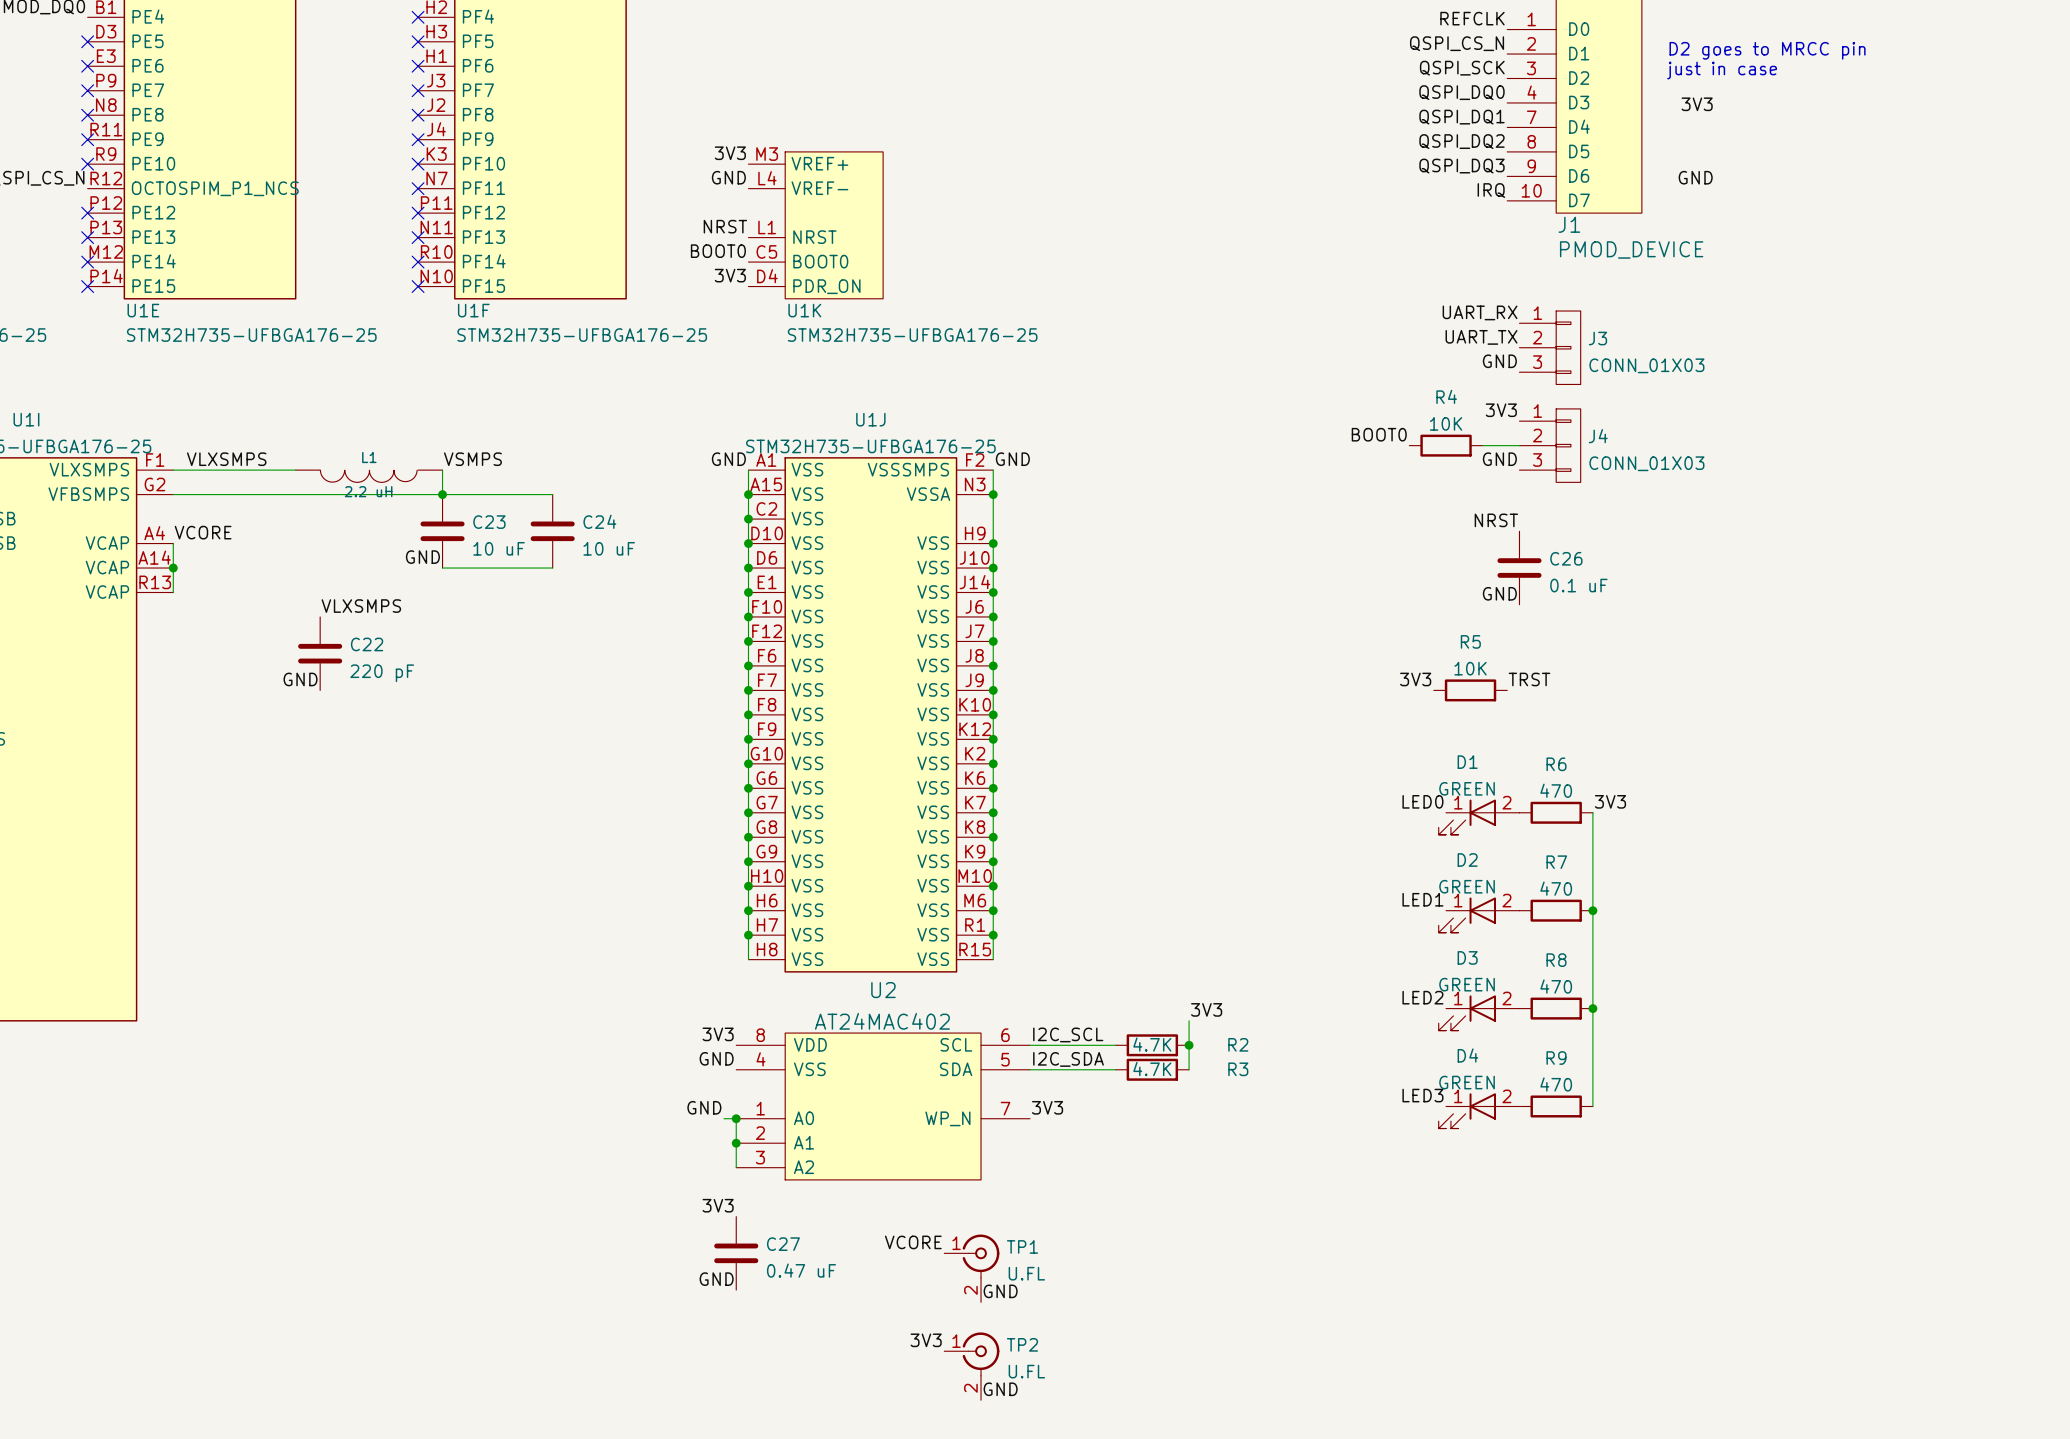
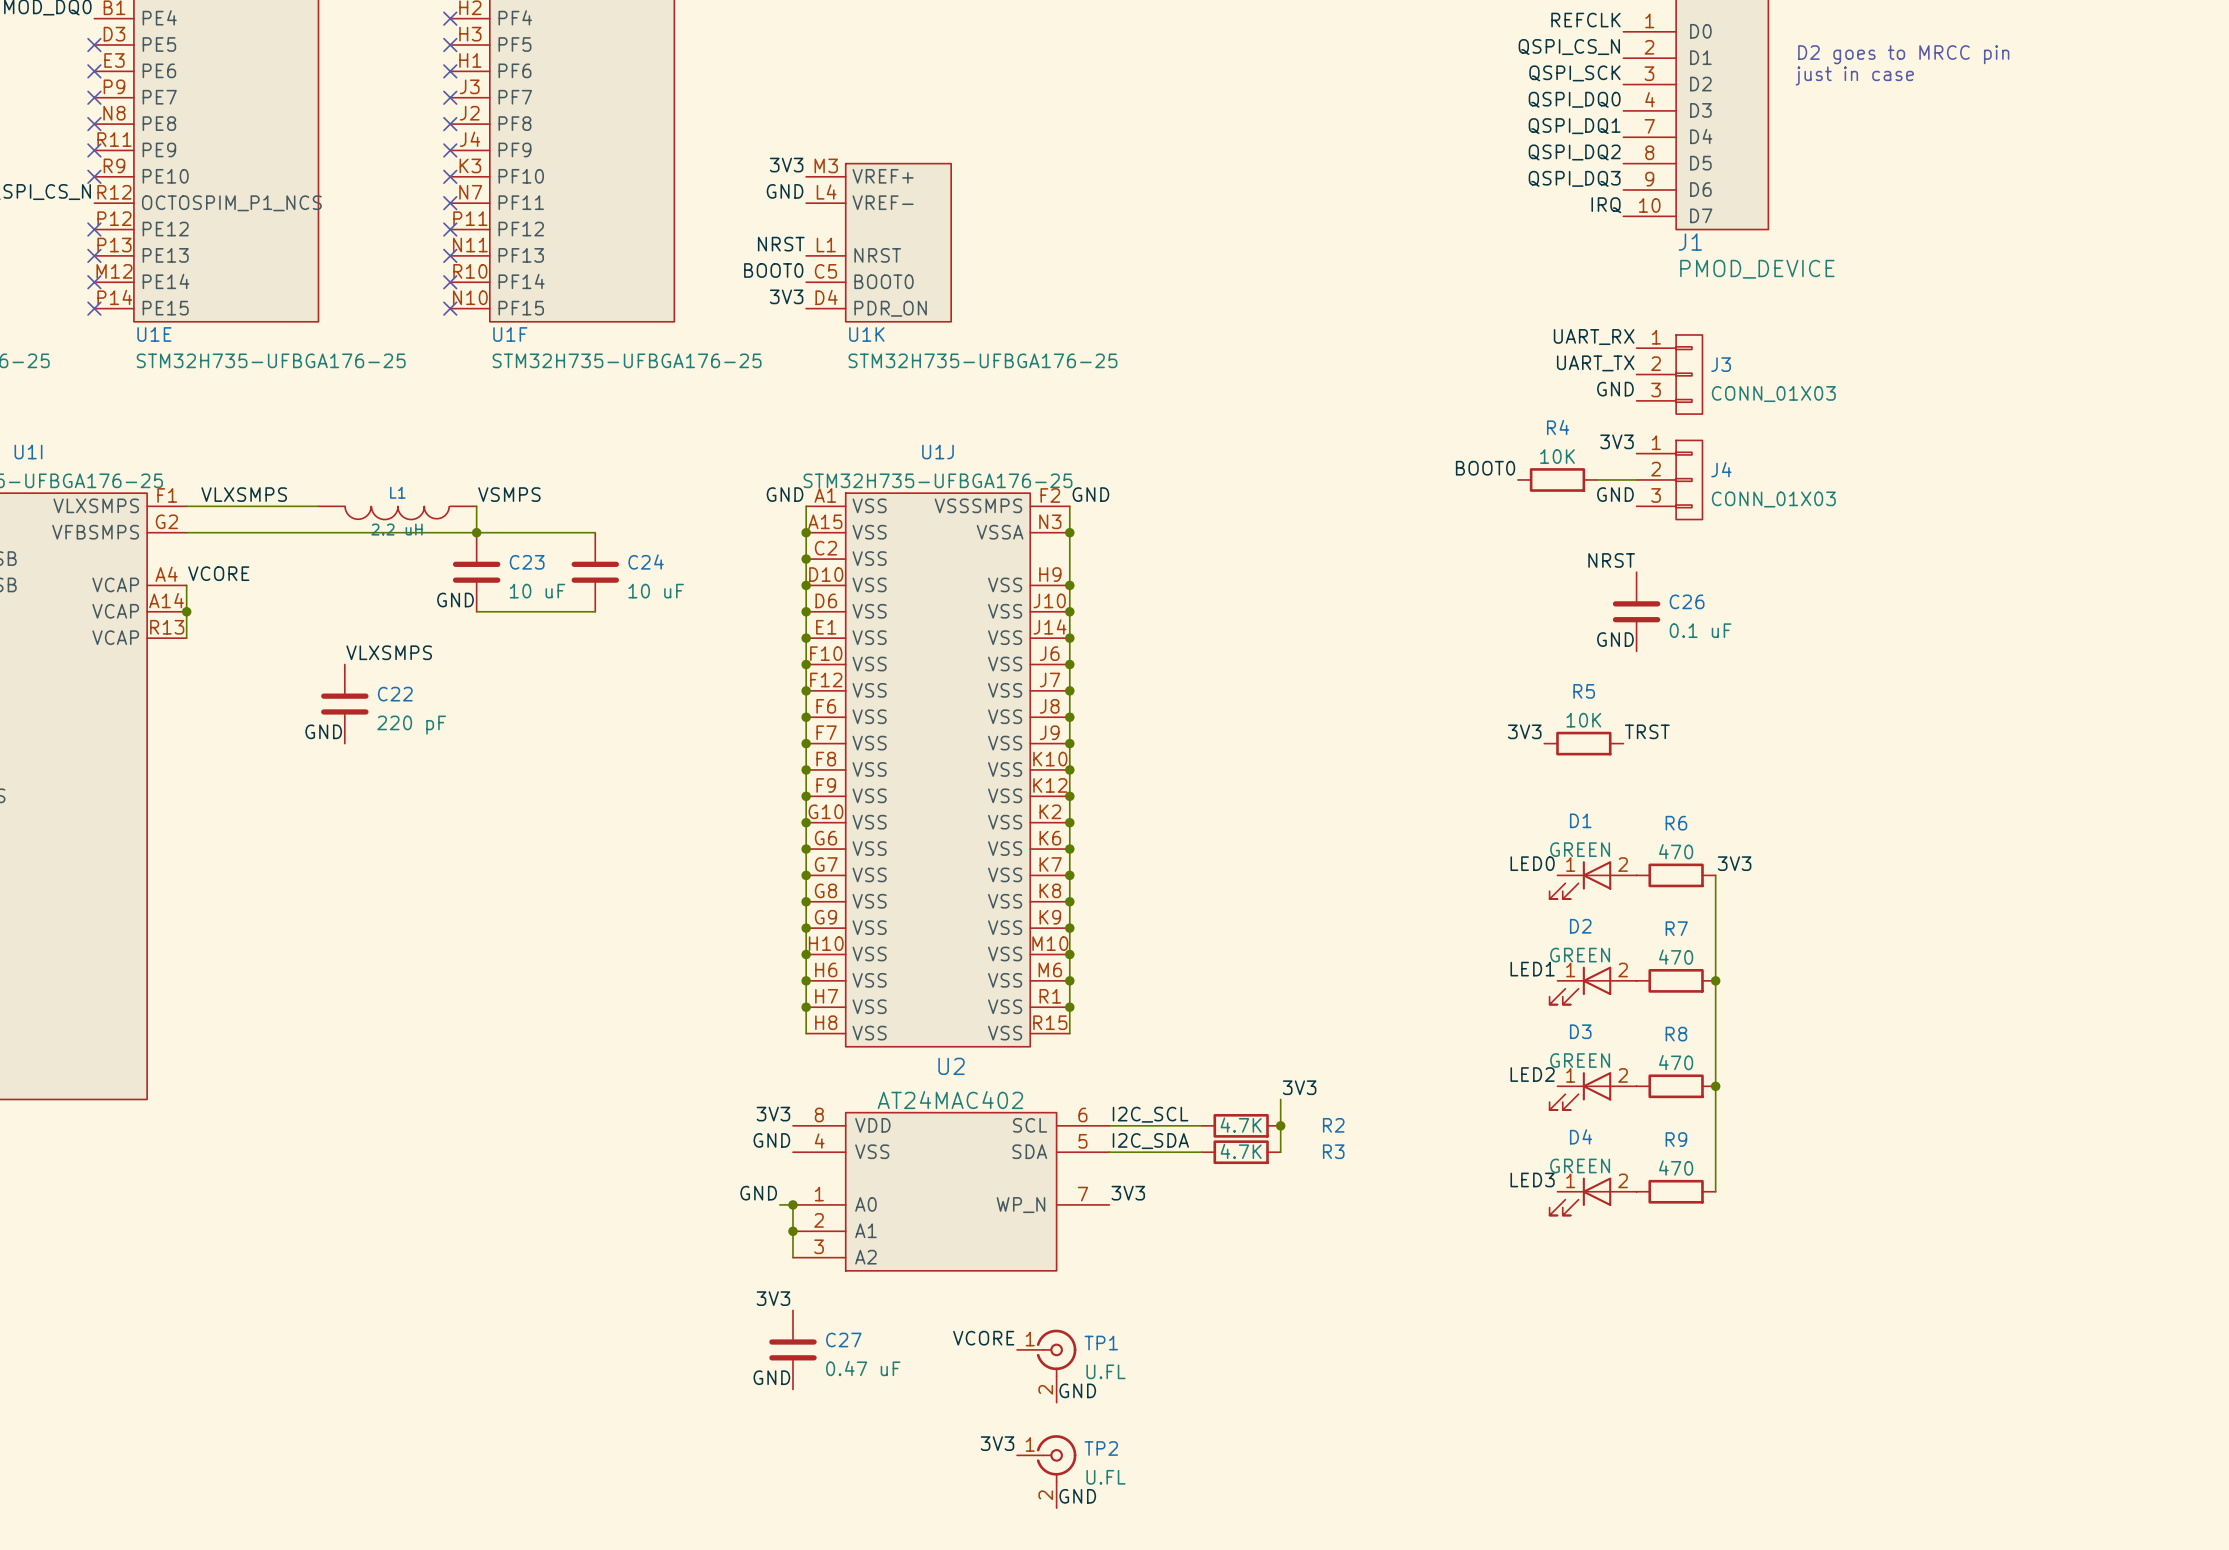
label: 3V3 (1697, 104) -> none
label: GND (1695, 177) -> none

